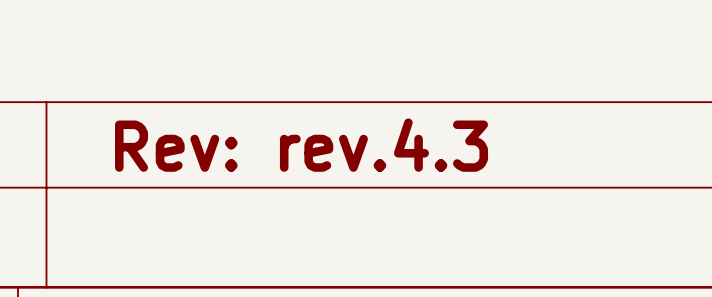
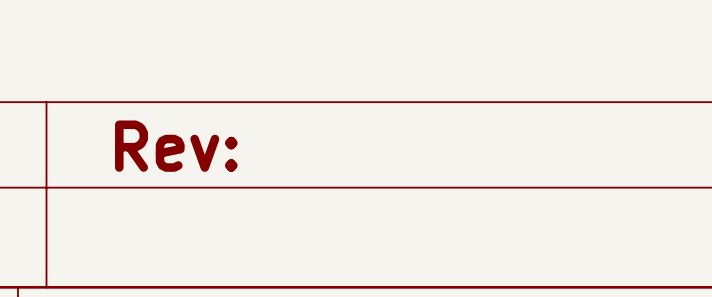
title block: Rev: rev.4.3 (301, 145) -> Rev: (176, 146)

